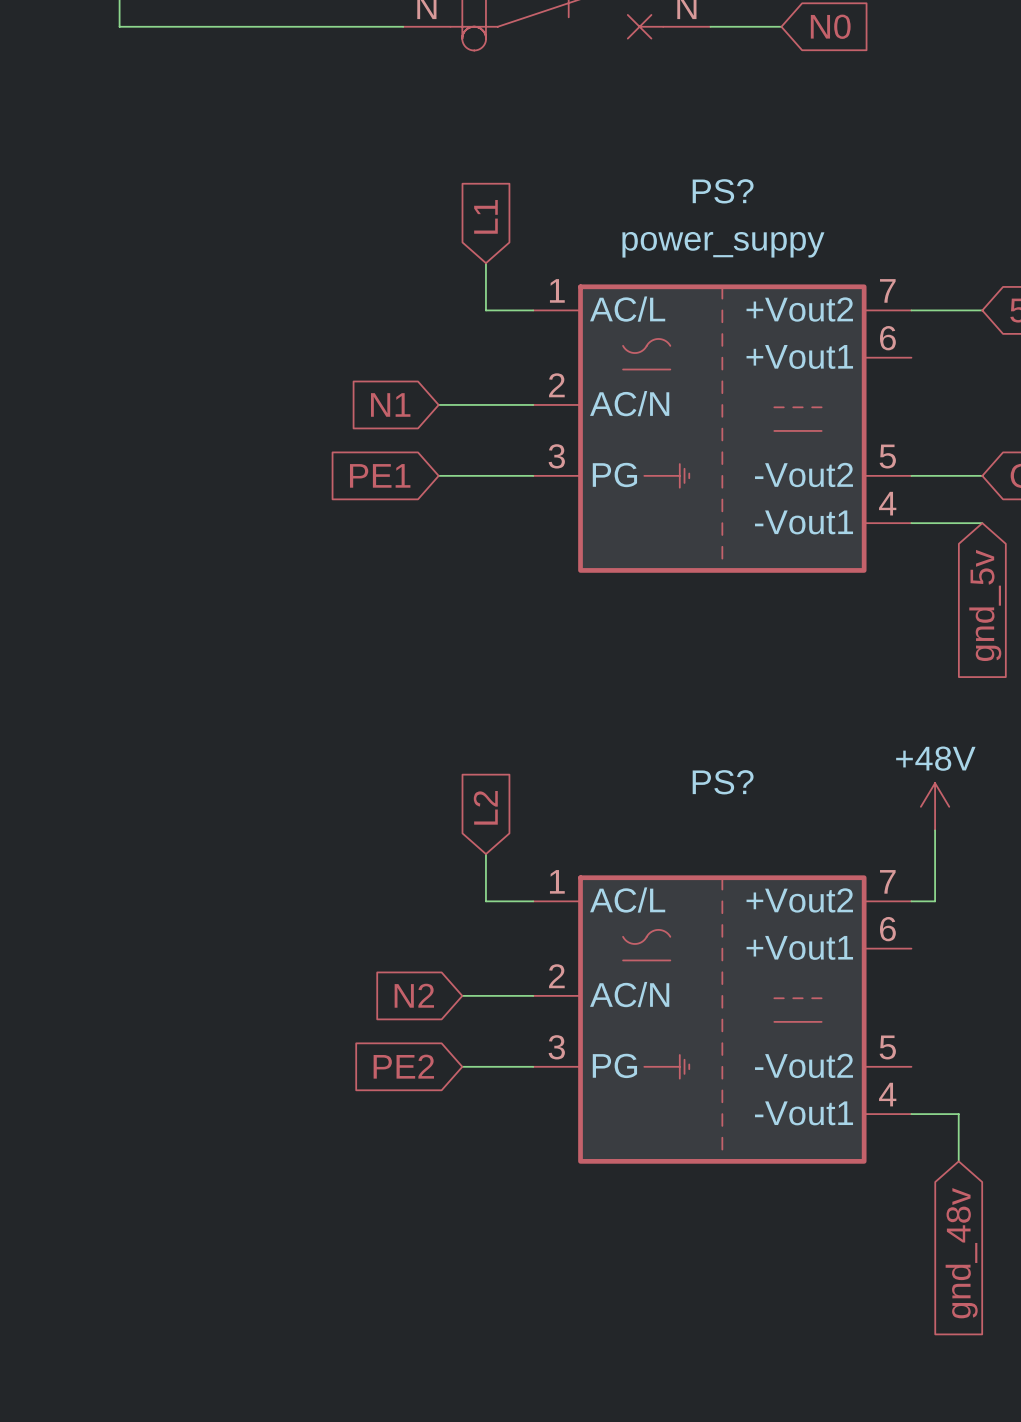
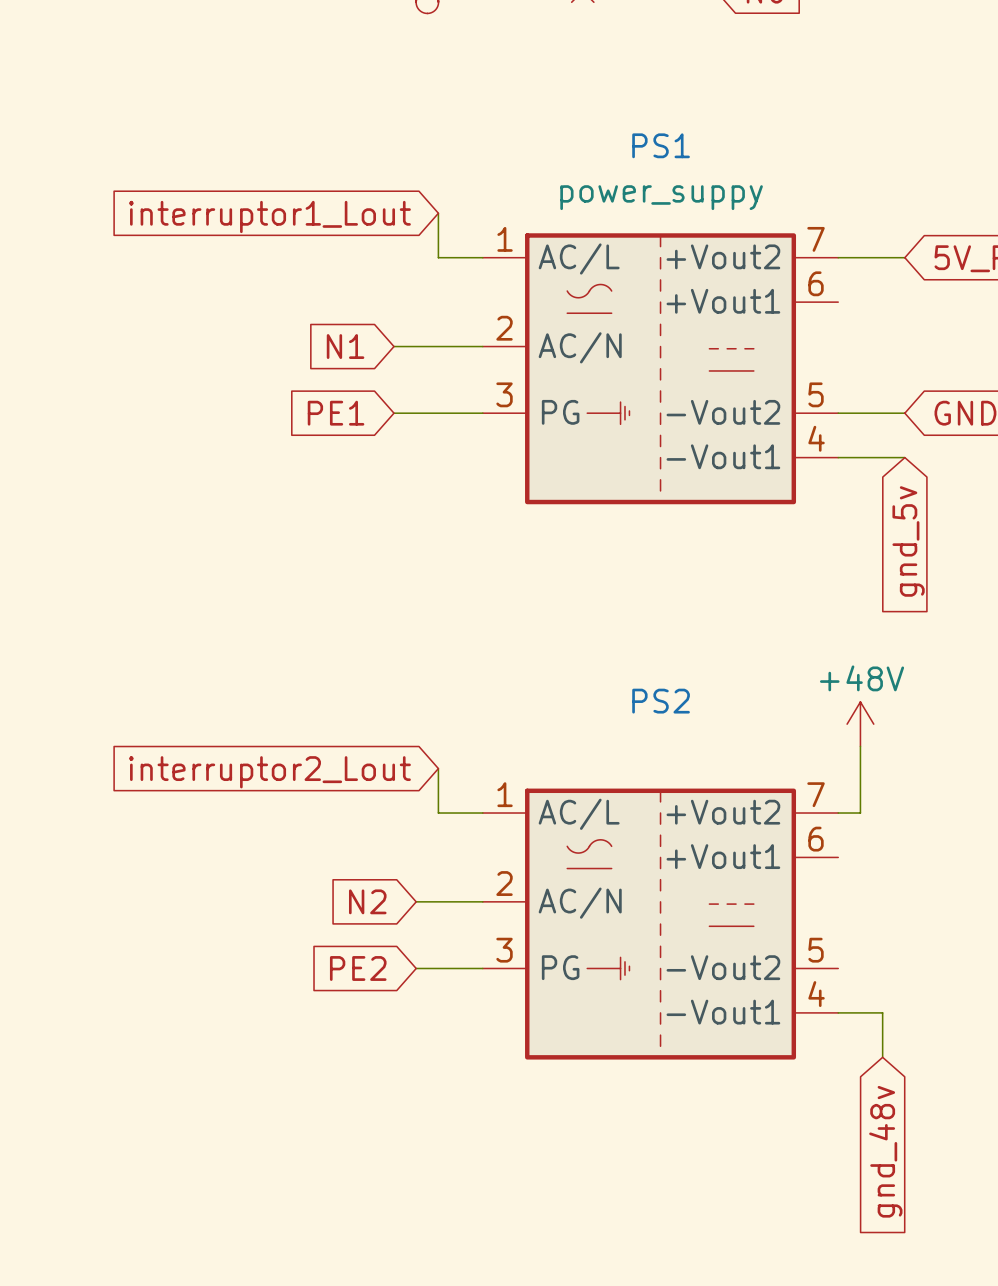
PS? name: PS? (723, 191) -> PS1 (661, 145)
global label: L1 (485, 216) -> interruptor1_Lout (269, 216)
PS? name: PS? (723, 782) -> PS2 (661, 701)
global label: L2 (485, 807) -> interruptor2_Lout (269, 772)

